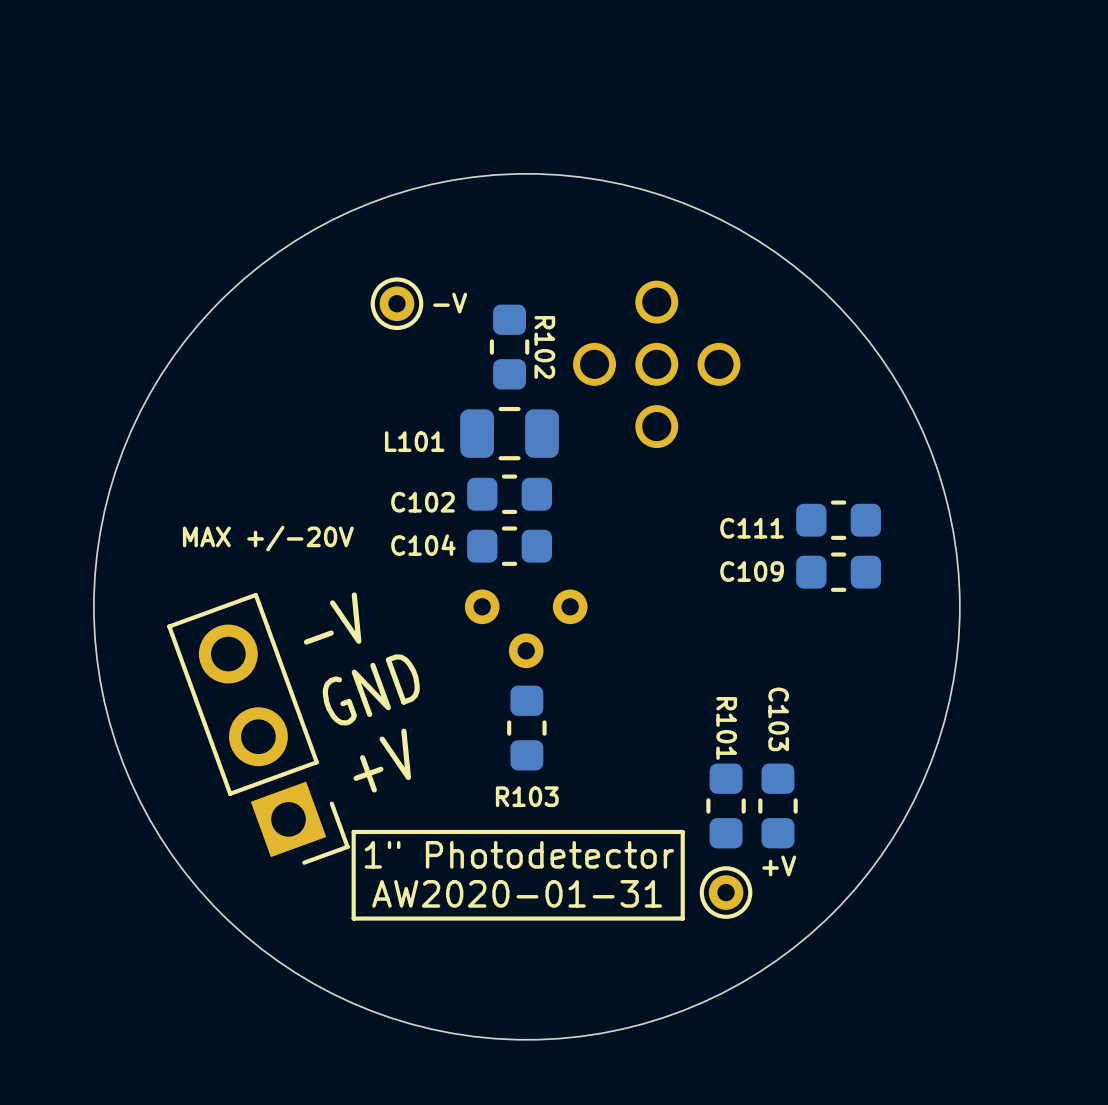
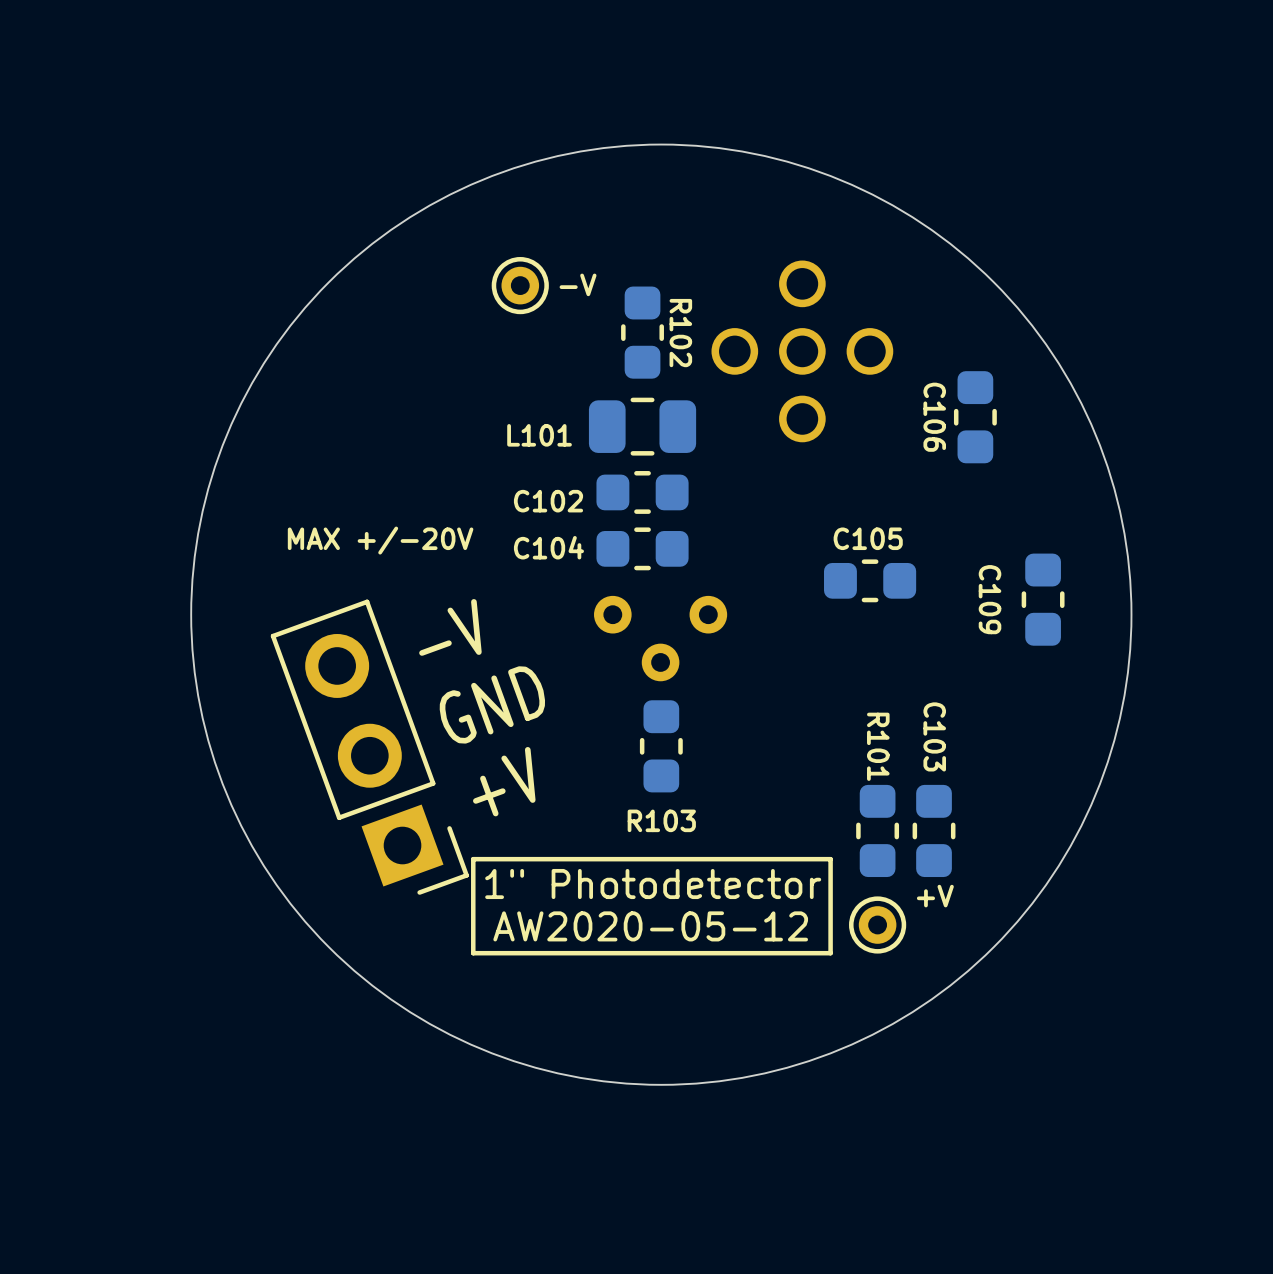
C106: none -> (975, 417)
C111: (838, 520) -> none
C109 rotation: 0° (838, 572) -> 90° clockwise (1043, 599)
C105: none -> (870, 580)
text: AW2020-01-31 (517, 893) -> AW2020-05-12 (650, 926)

